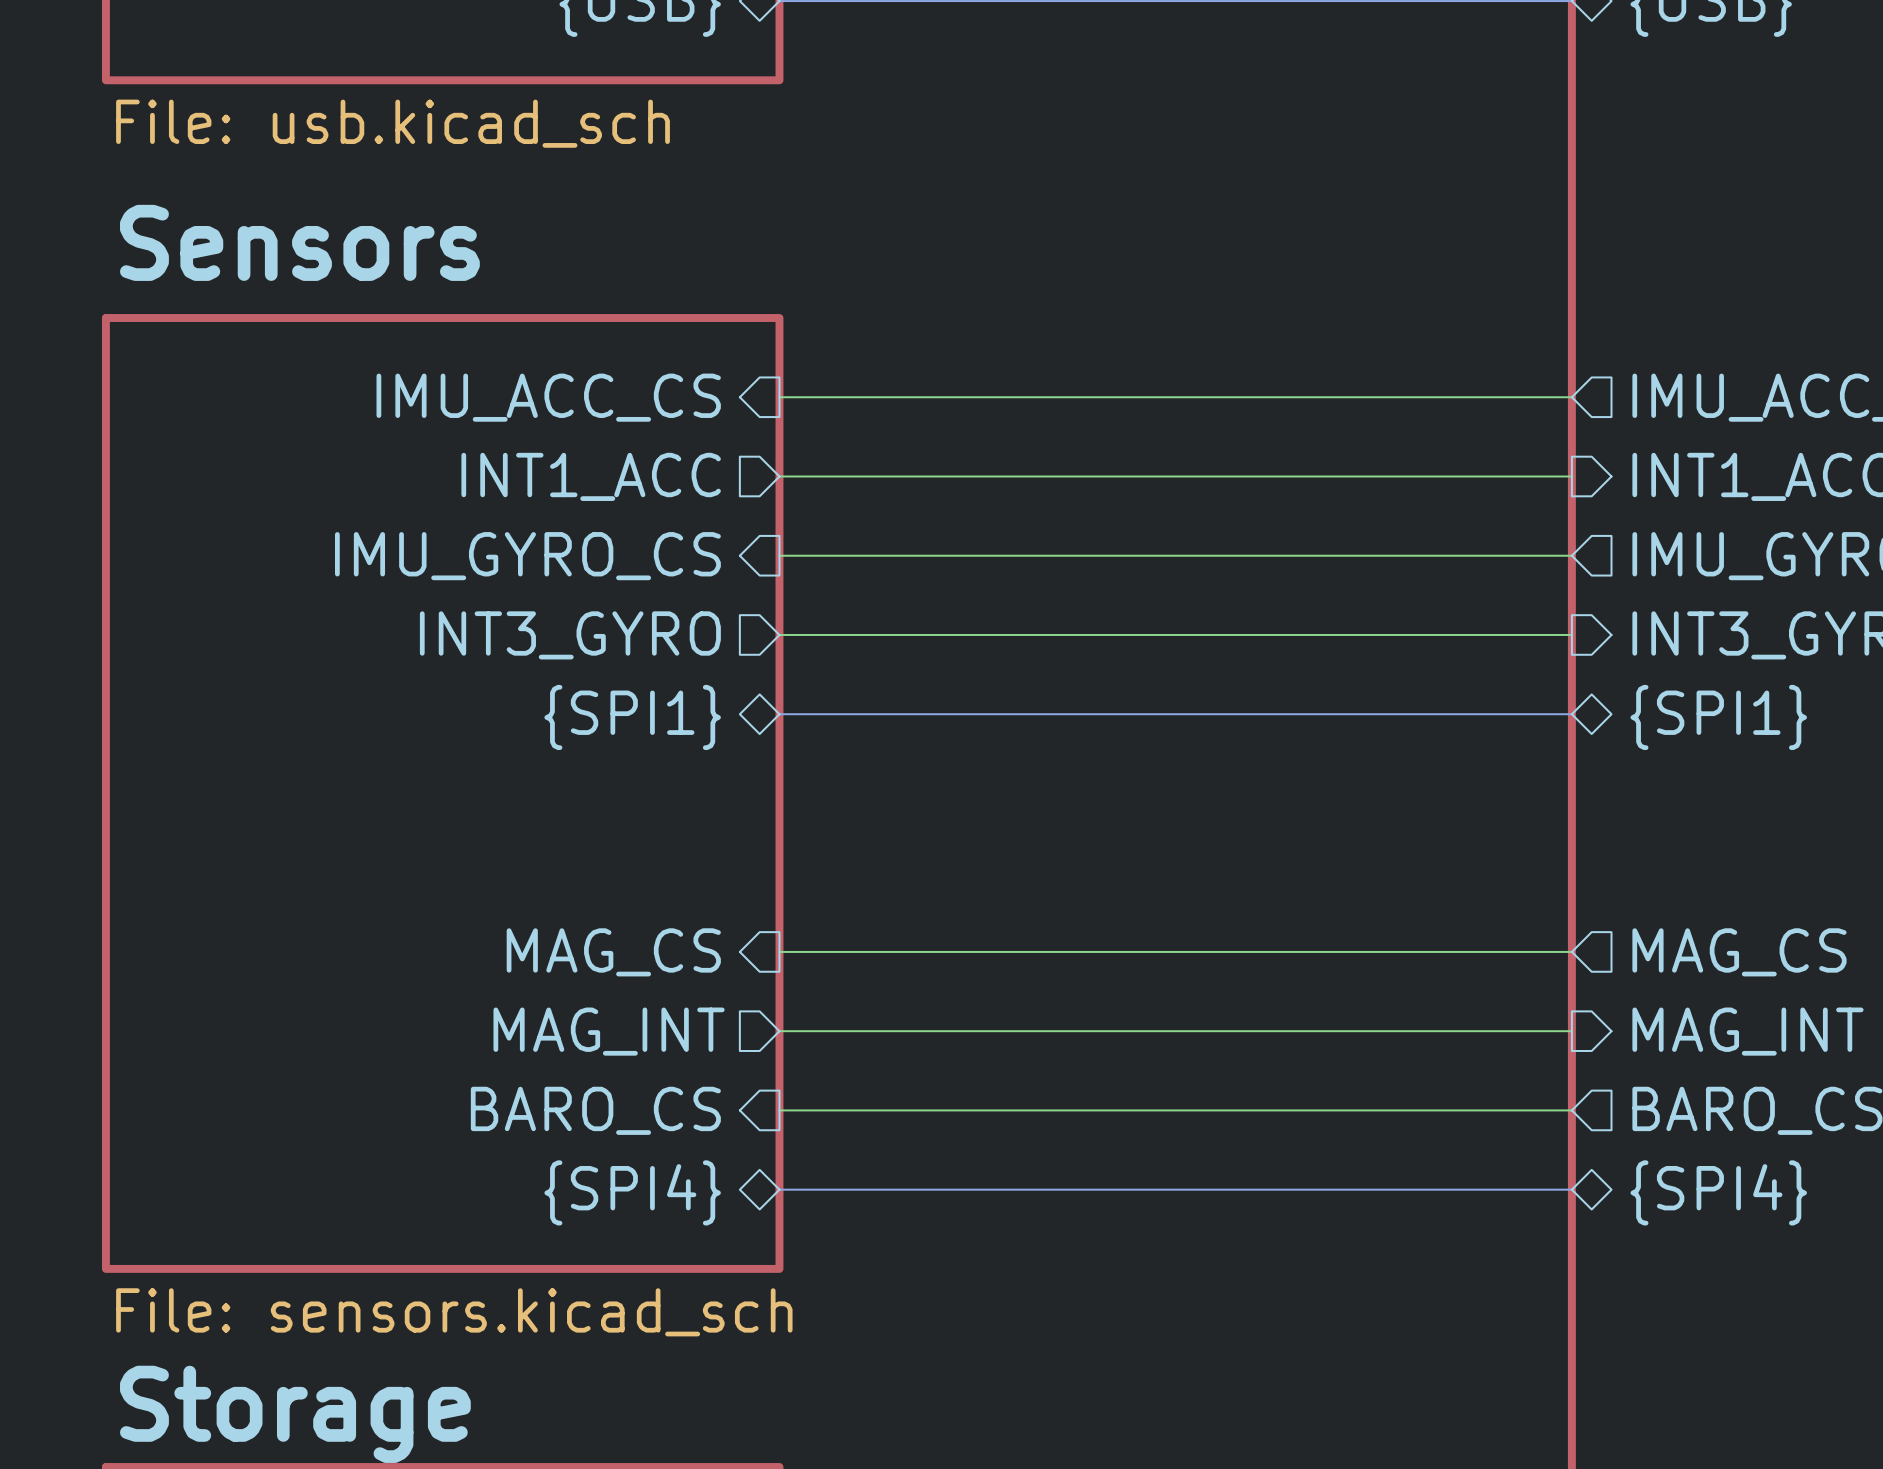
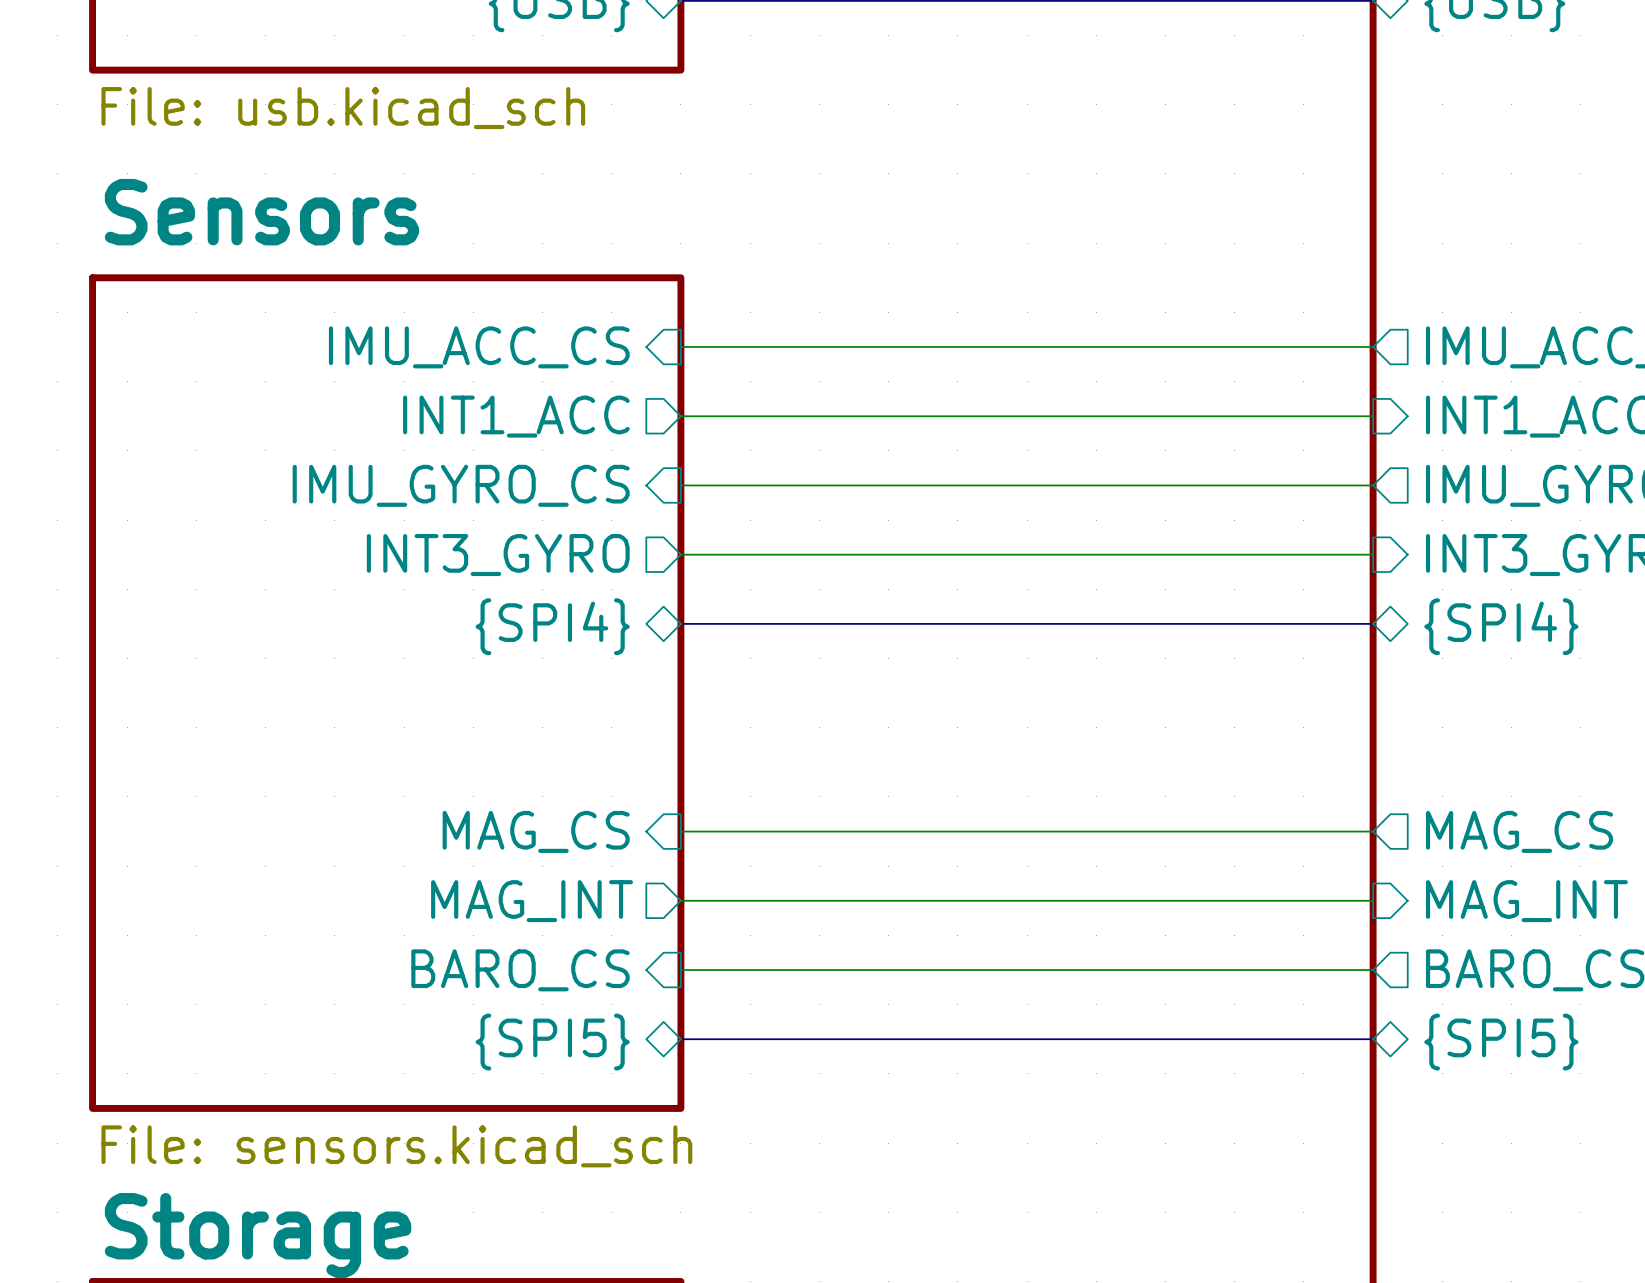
sheet pin: {SPI1} (632, 717) -> {SPI4} (552, 626)
sheet pin: {SPI1} (1718, 717) -> {SPI4} (1501, 626)
sheet pin: {SPI4} (632, 1192) -> {SPI5} (552, 1042)
sheet pin: {SPI4} (1718, 1192) -> {SPI5} (1501, 1042)

